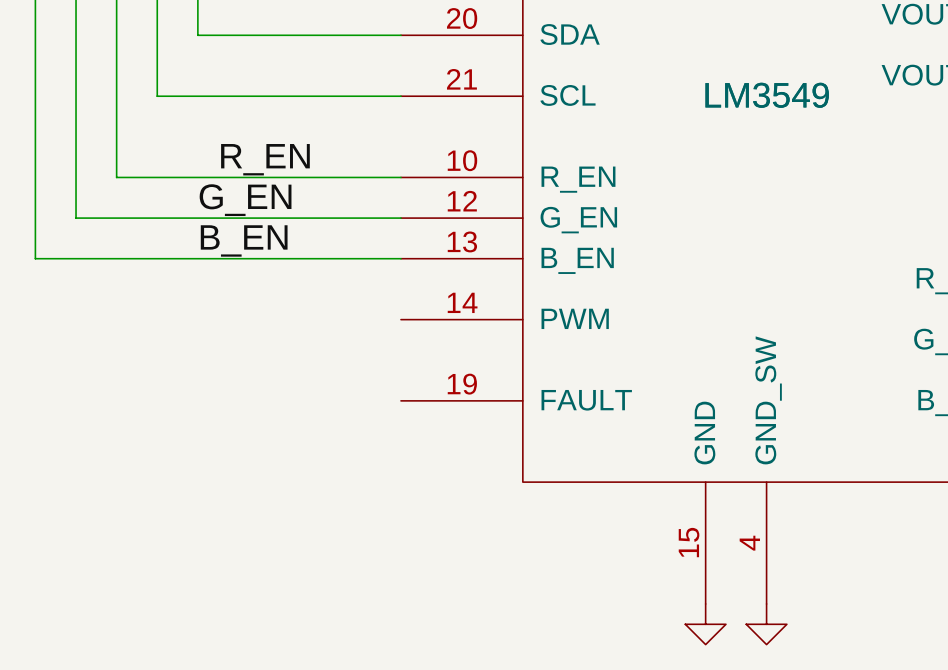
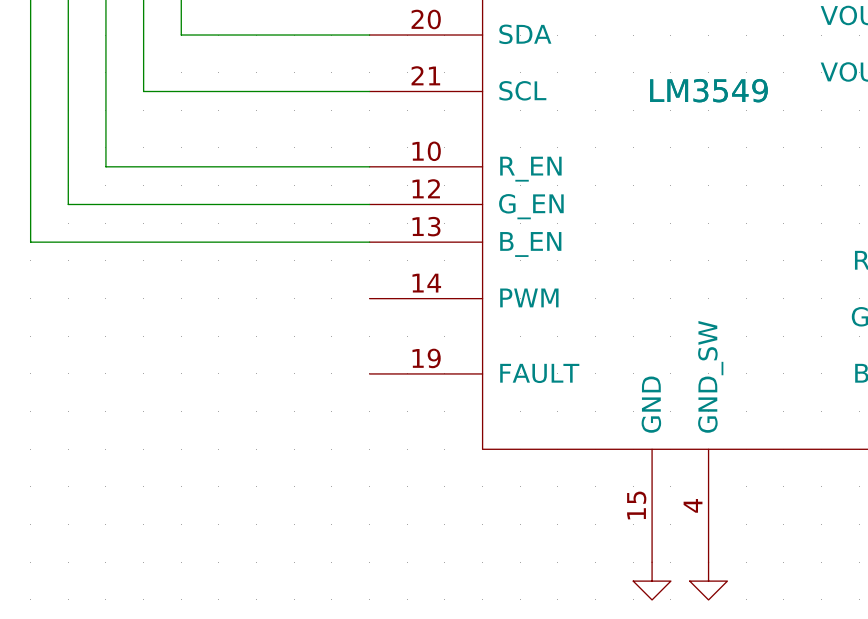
label: R_EN (265, 159) -> none
label: G_EN (245, 200) -> none
label: B_EN (244, 240) -> none

